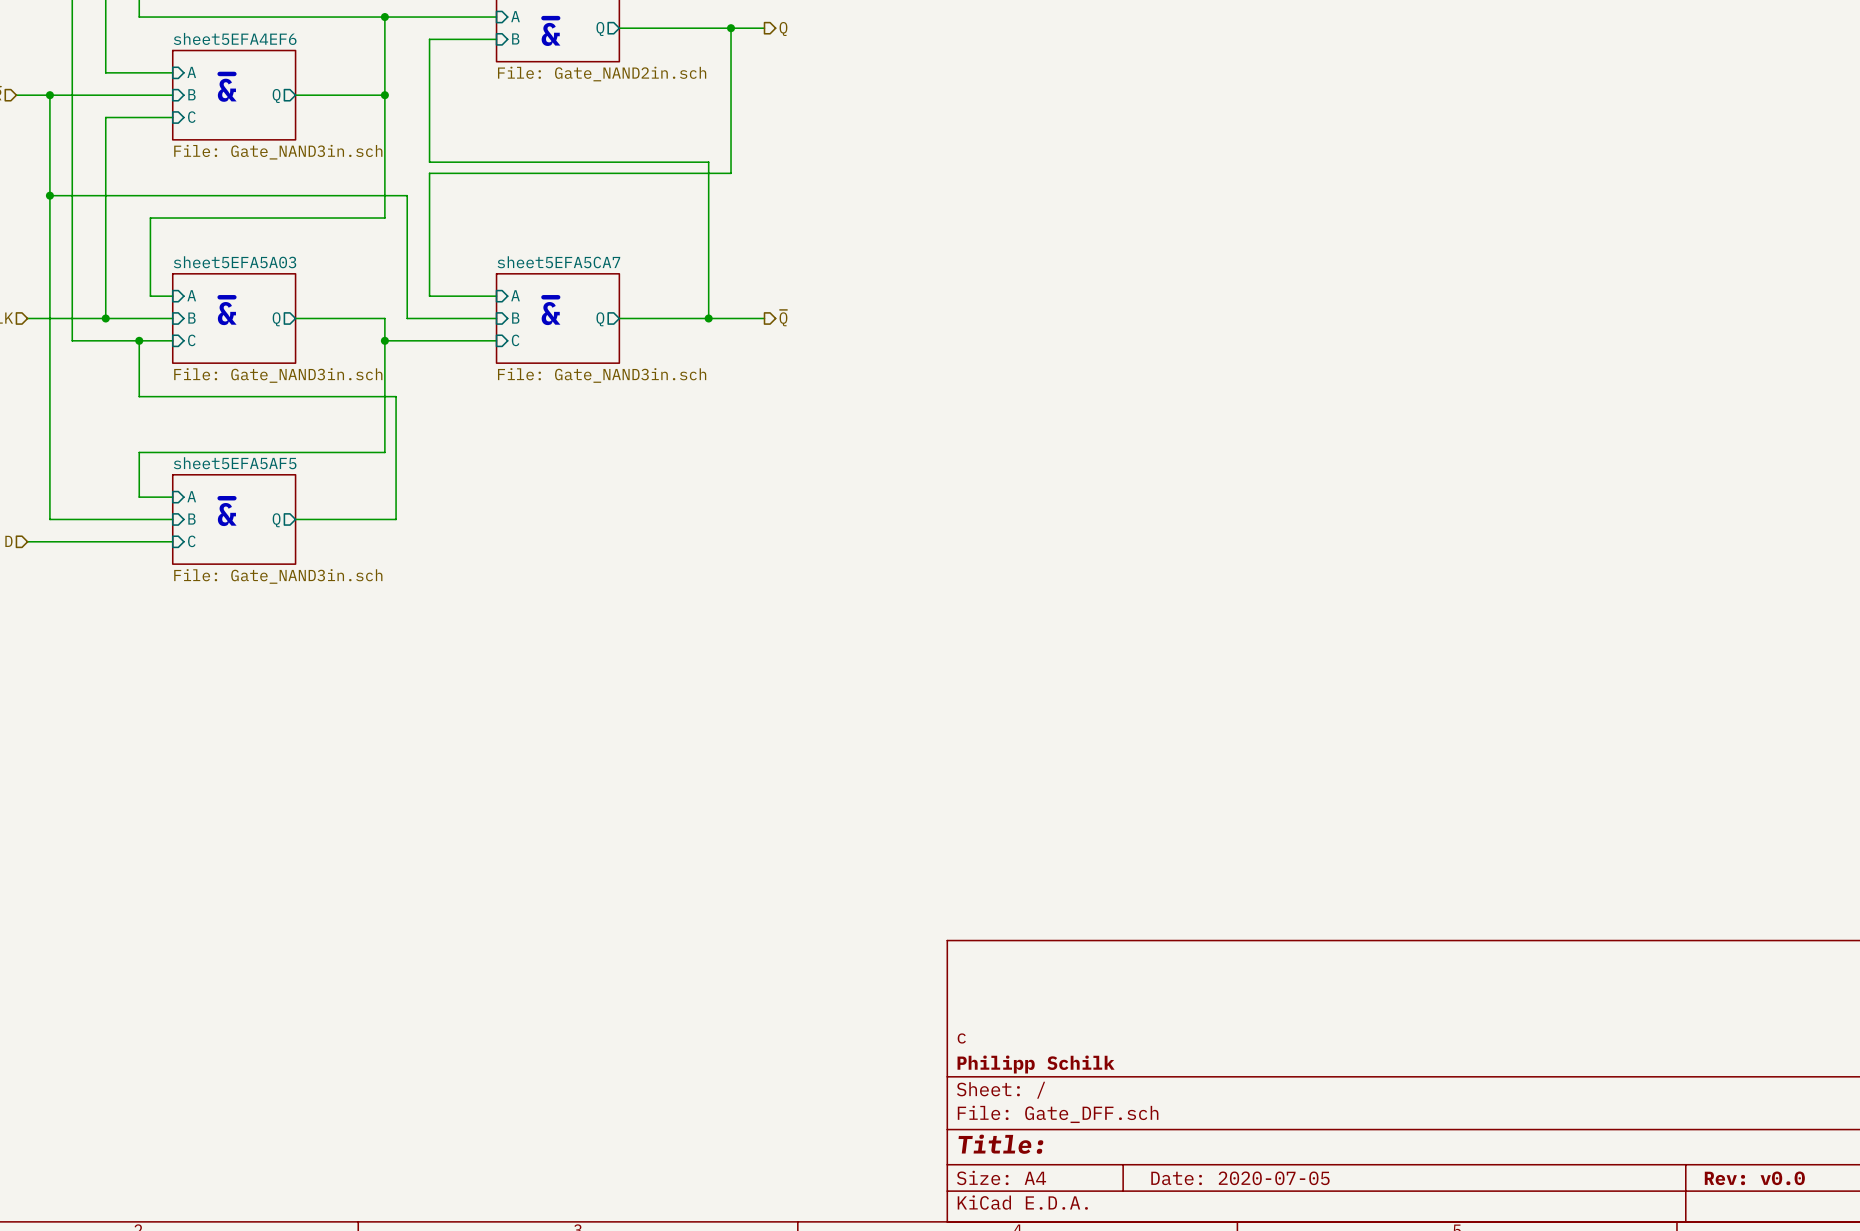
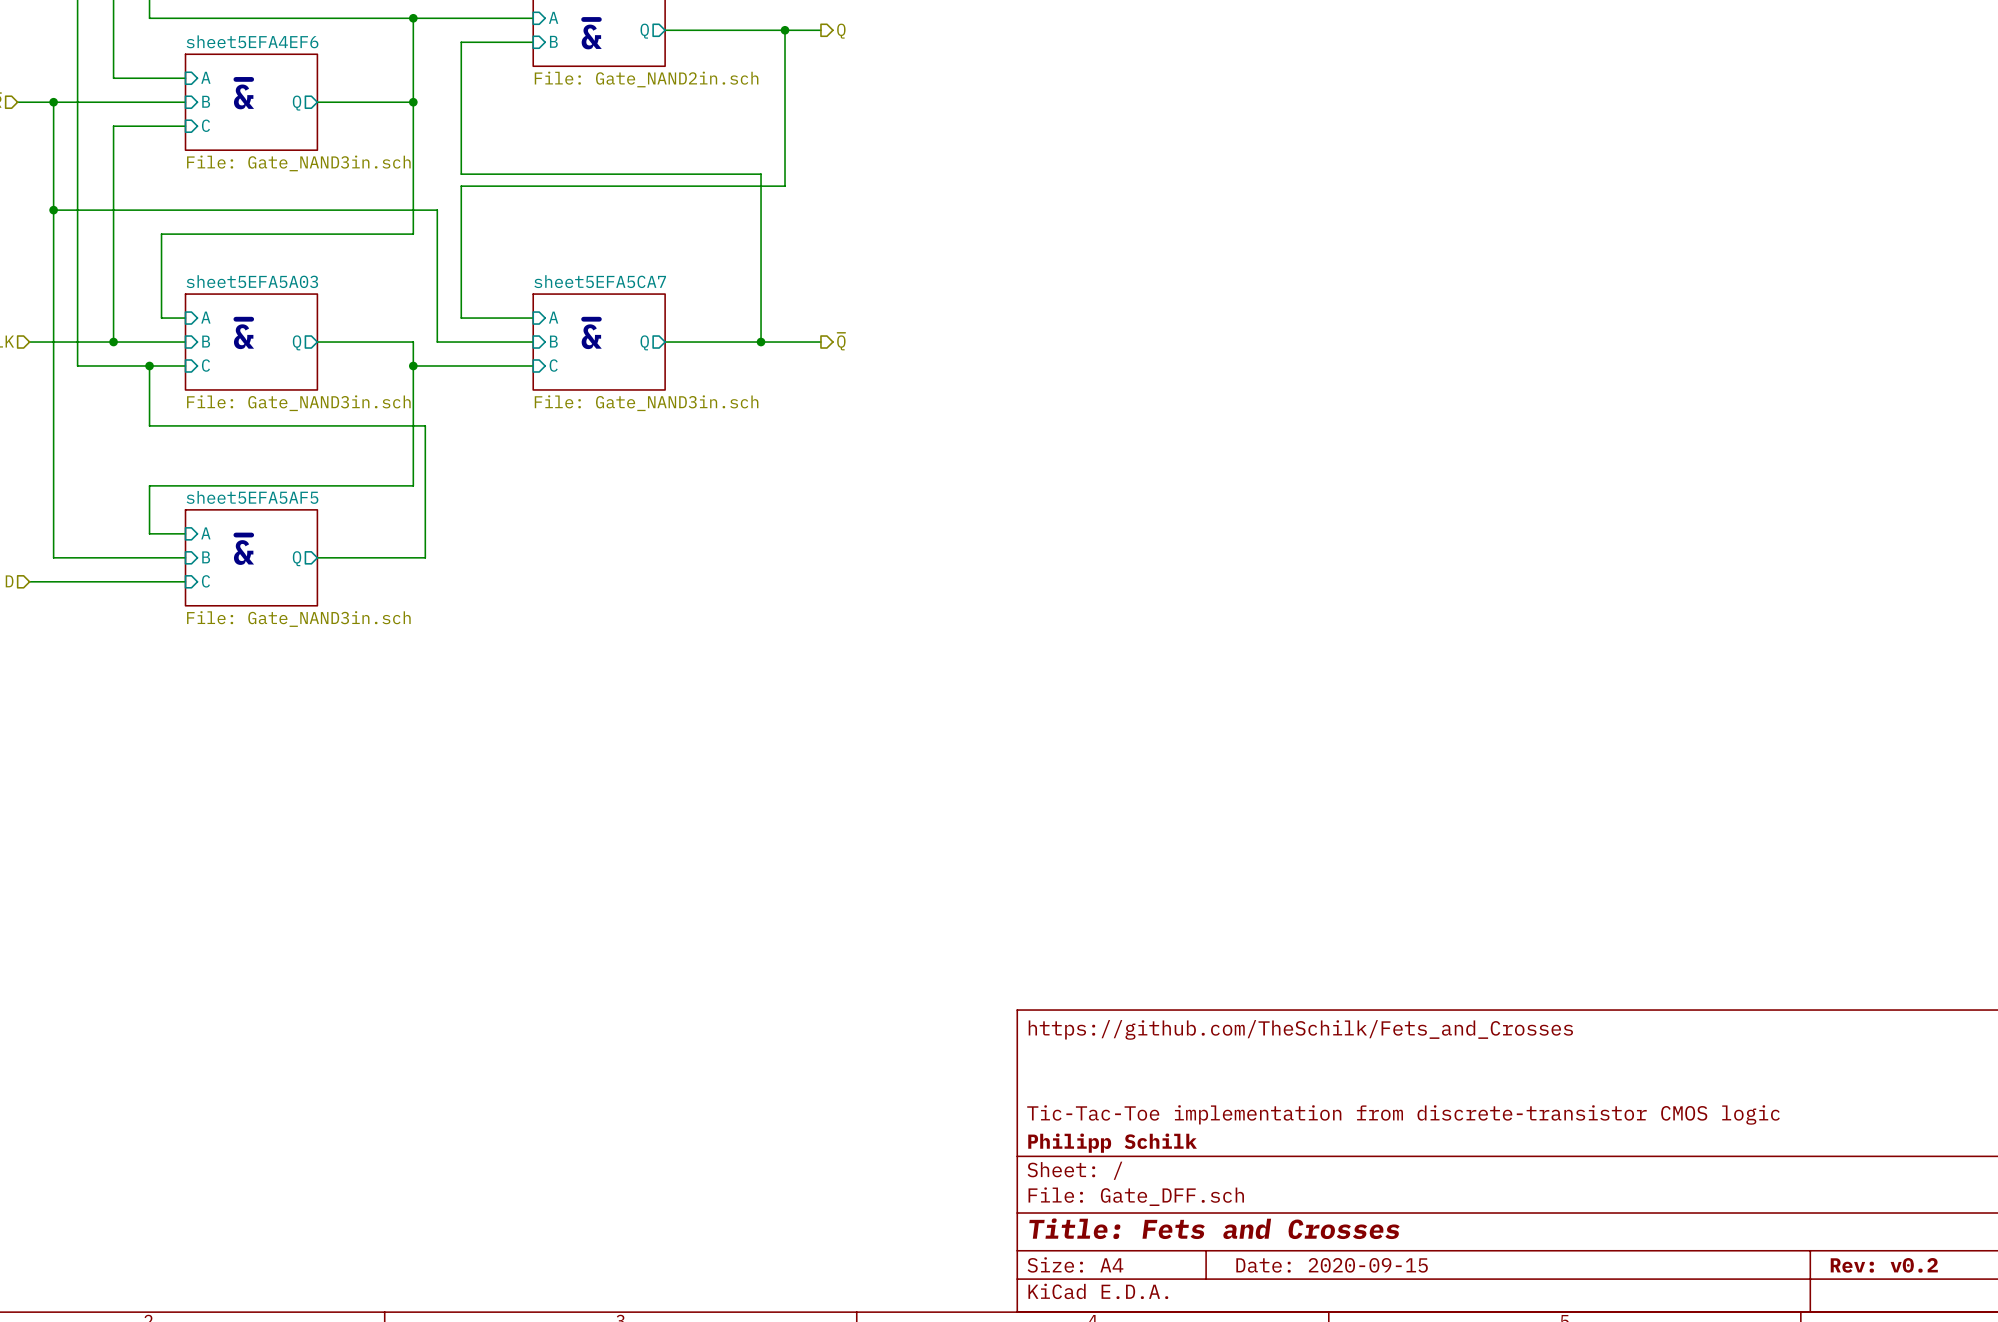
title block: none -> https://github.com/TheSchilk/Fets_and_Crosses (1300, 1029)
title block: c (961, 1038) -> Tic-Tac-Toe implementation from discrete-transistor CMOS logic (1403, 1114)
title block: Title: (1000, 1144) -> Title: Fets and Crosses (1214, 1228)
title block: Date: 2020-07-05 (1240, 1178) -> Date: 2020-09-15 (1332, 1265)
title block: Rev: v0.0 (1754, 1178) -> Rev: v0.2 (1884, 1265)

